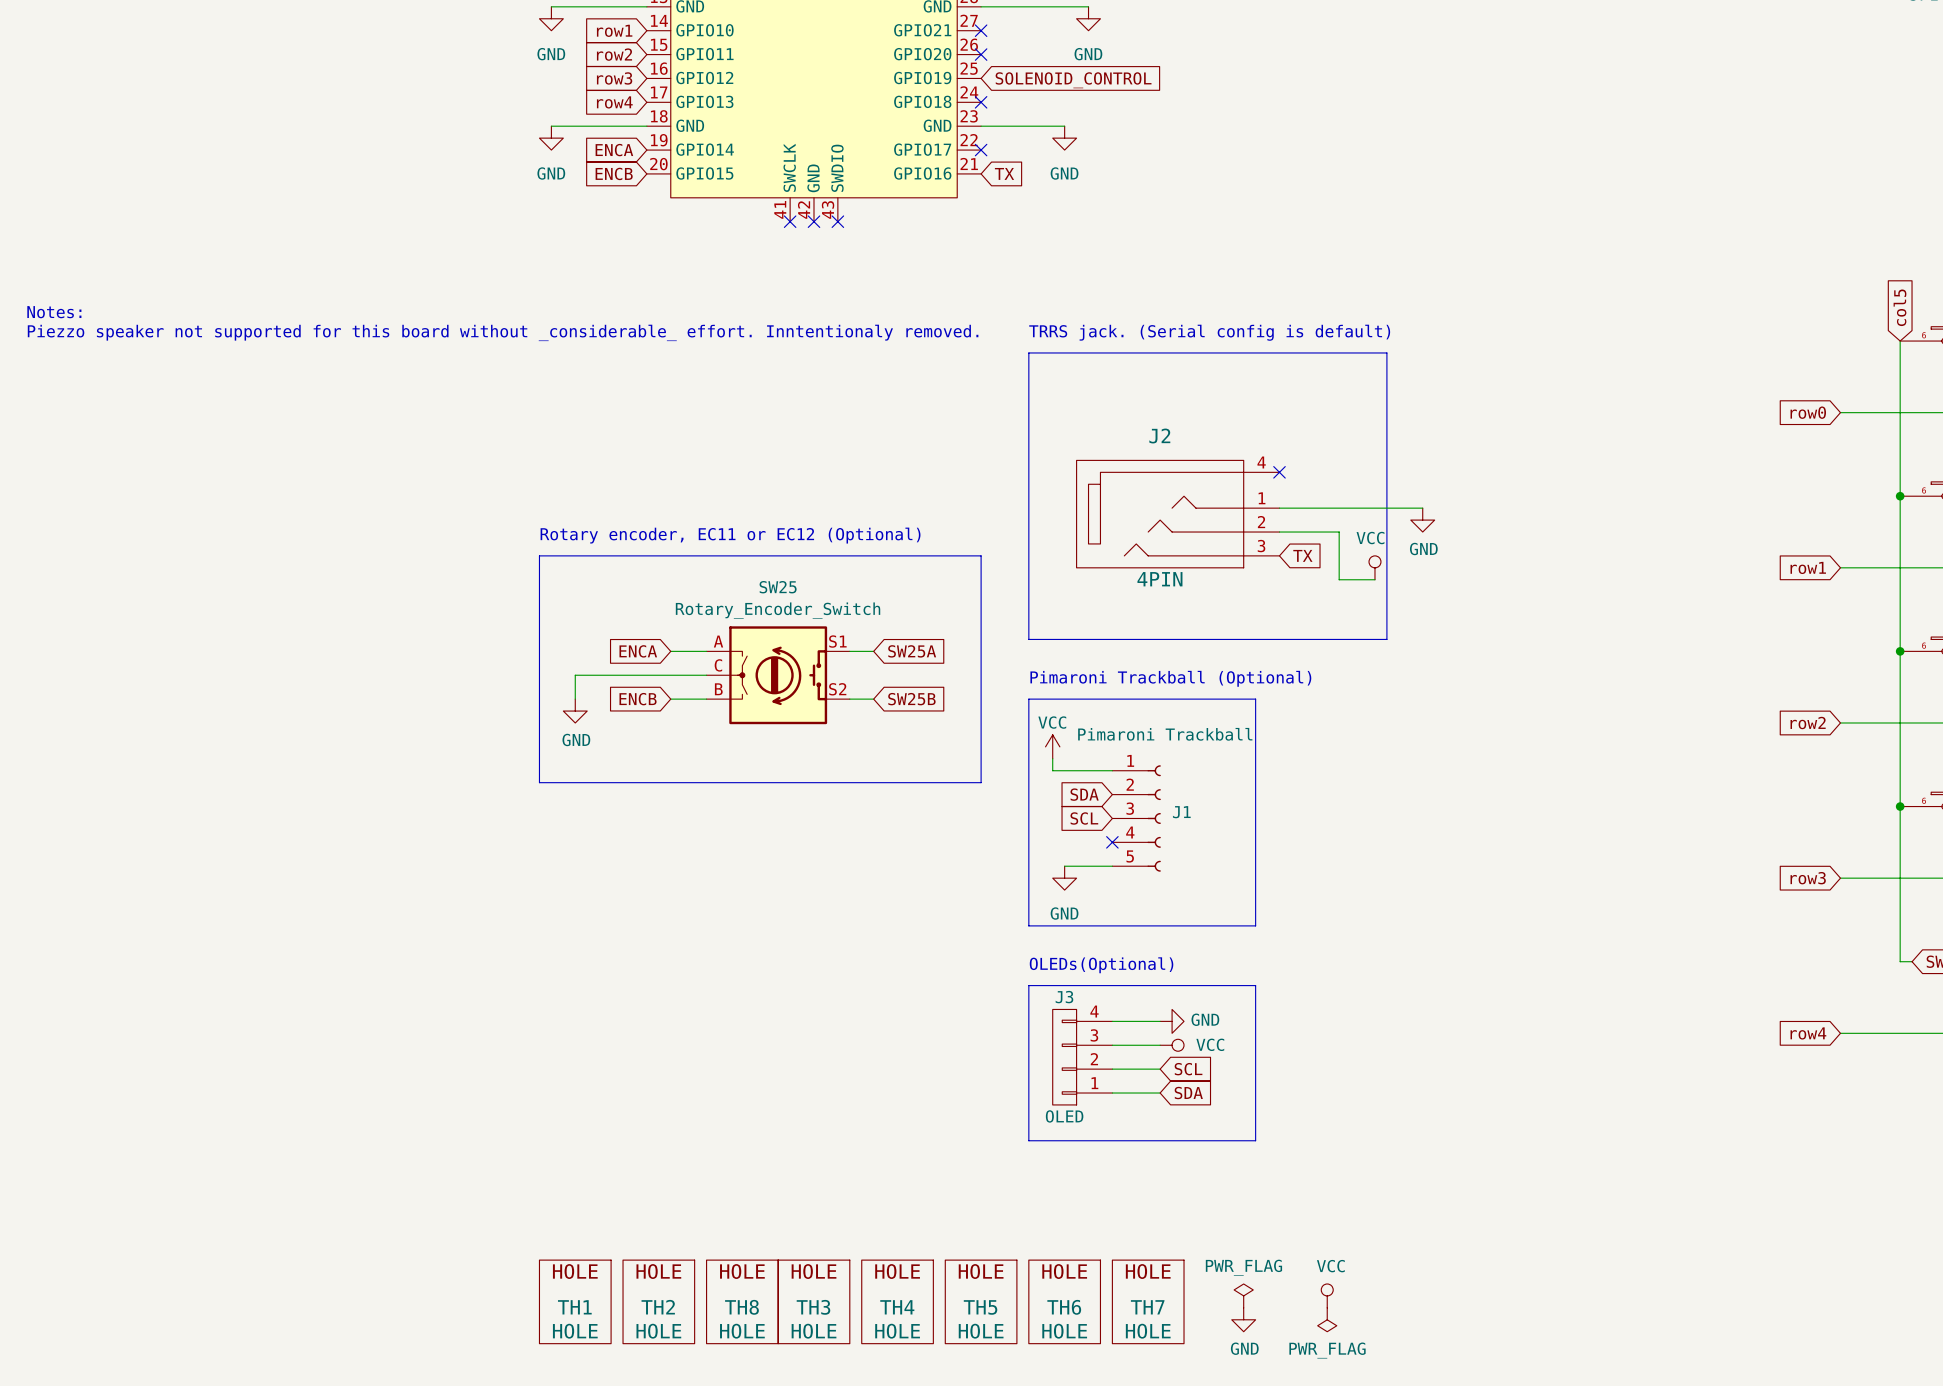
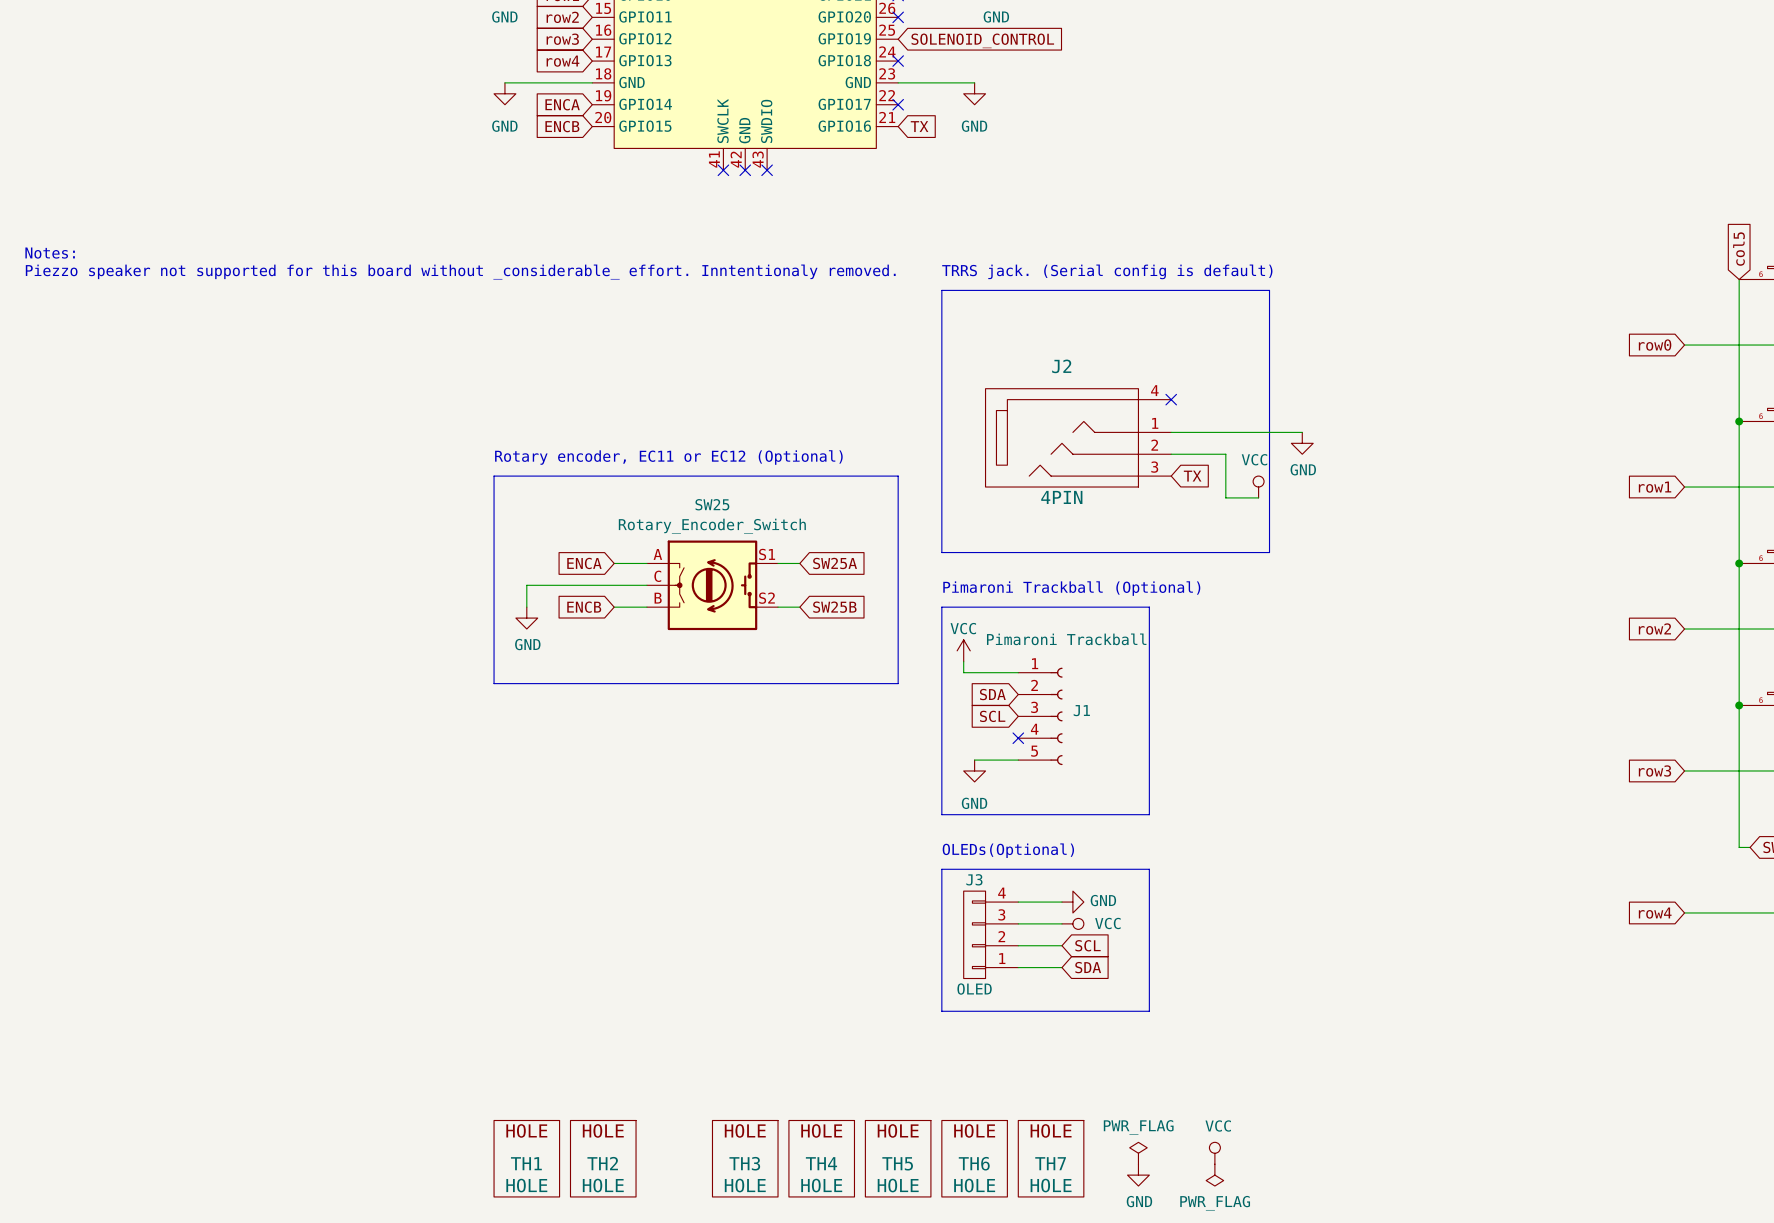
TH8: HOLE (742, 1301) -> none

